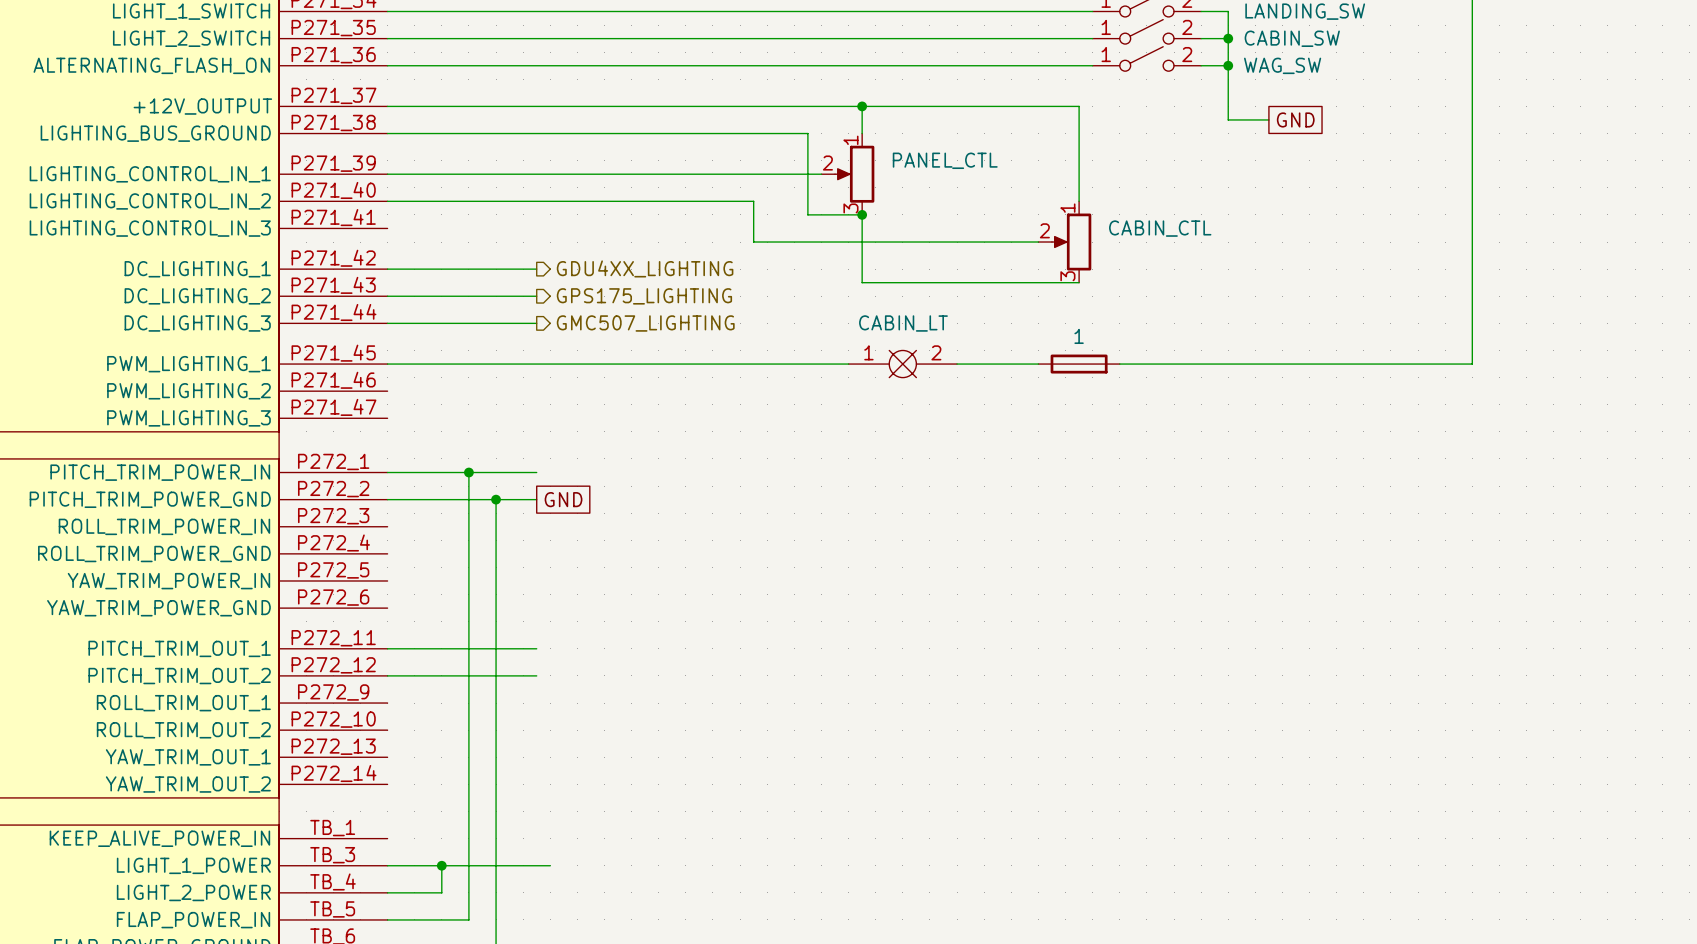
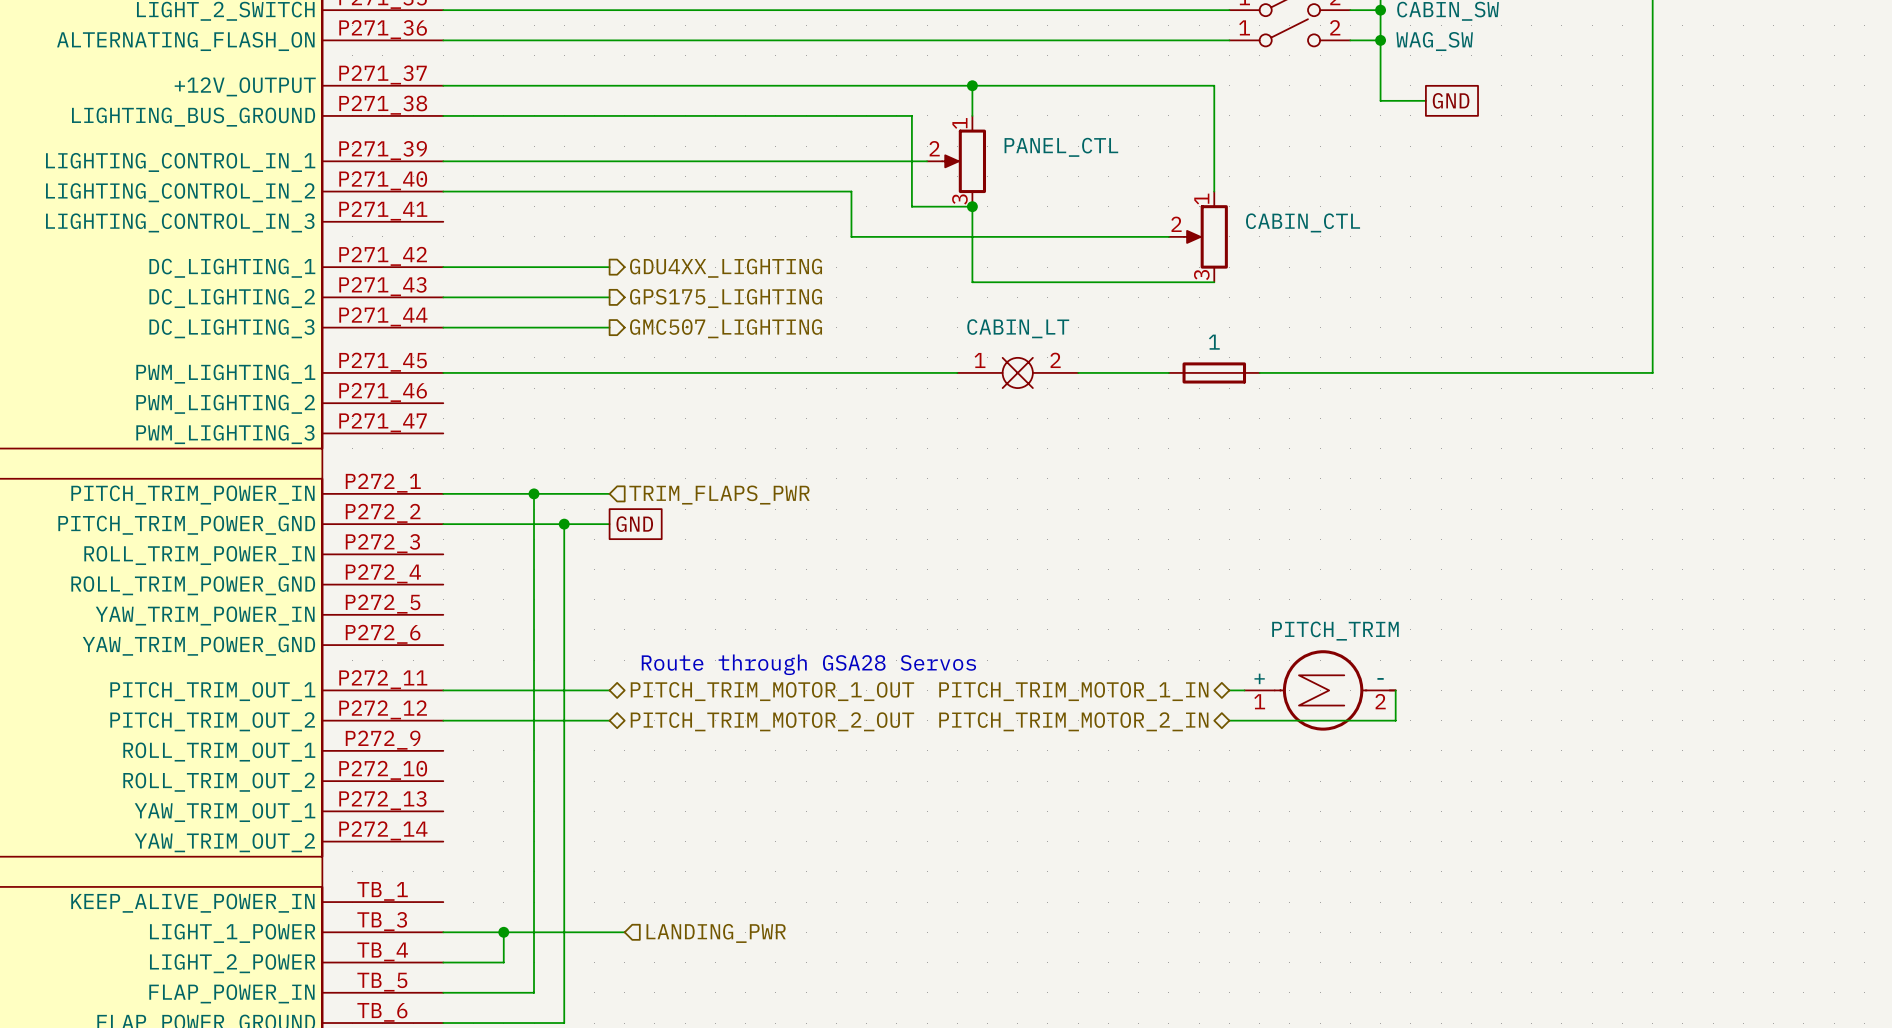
hierarchical label: none -> TRIM_FLAPS_PWR (719, 495)
text: none -> Route through GSA28 Servos (808, 664)
hierarchical label: none -> PITCH_TRIM_MOTOR_1_OUT (772, 691)
hierarchical label: none -> PITCH_TRIM_MOTOR_1_IN (1073, 691)
wire: none -> (1229, 690) (1244, 690)
PITCH_TRIM: none -> (1320, 690)
wire: none -> (1395, 690) (1395, 720) (1229, 720)
hierarchical label: none -> PITCH_TRIM_MOTOR_2_OUT (772, 721)
hierarchical label: none -> PITCH_TRIM_MOTOR_2_IN (1073, 721)
hierarchical label: none -> LANDING_PWR (716, 933)

